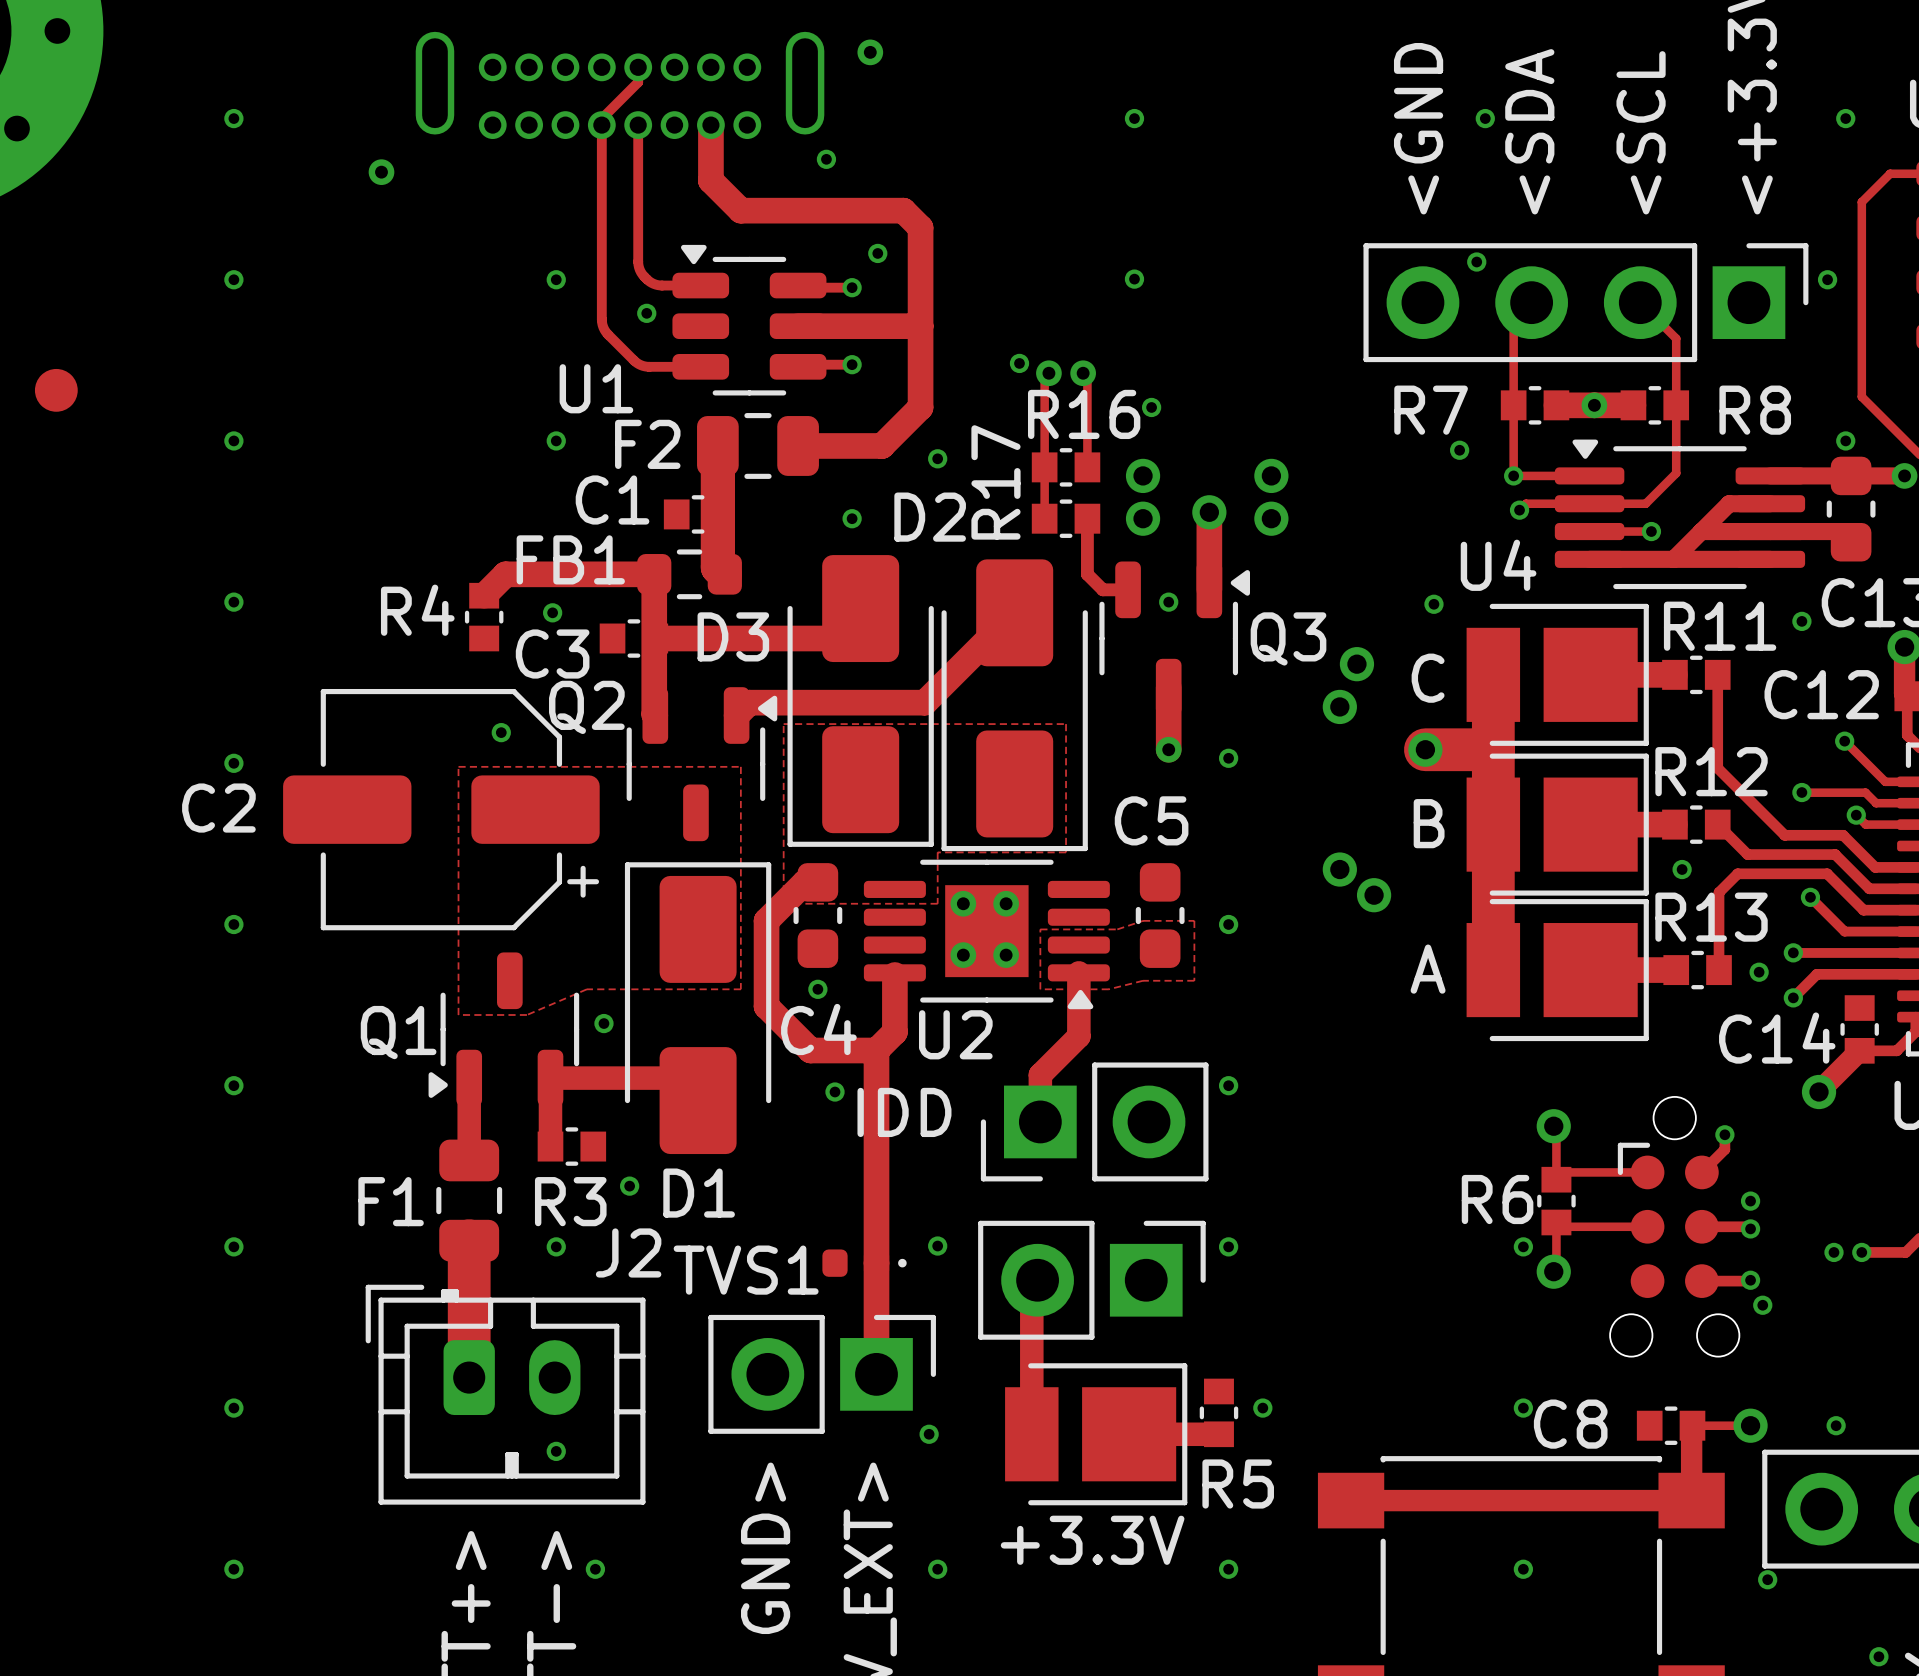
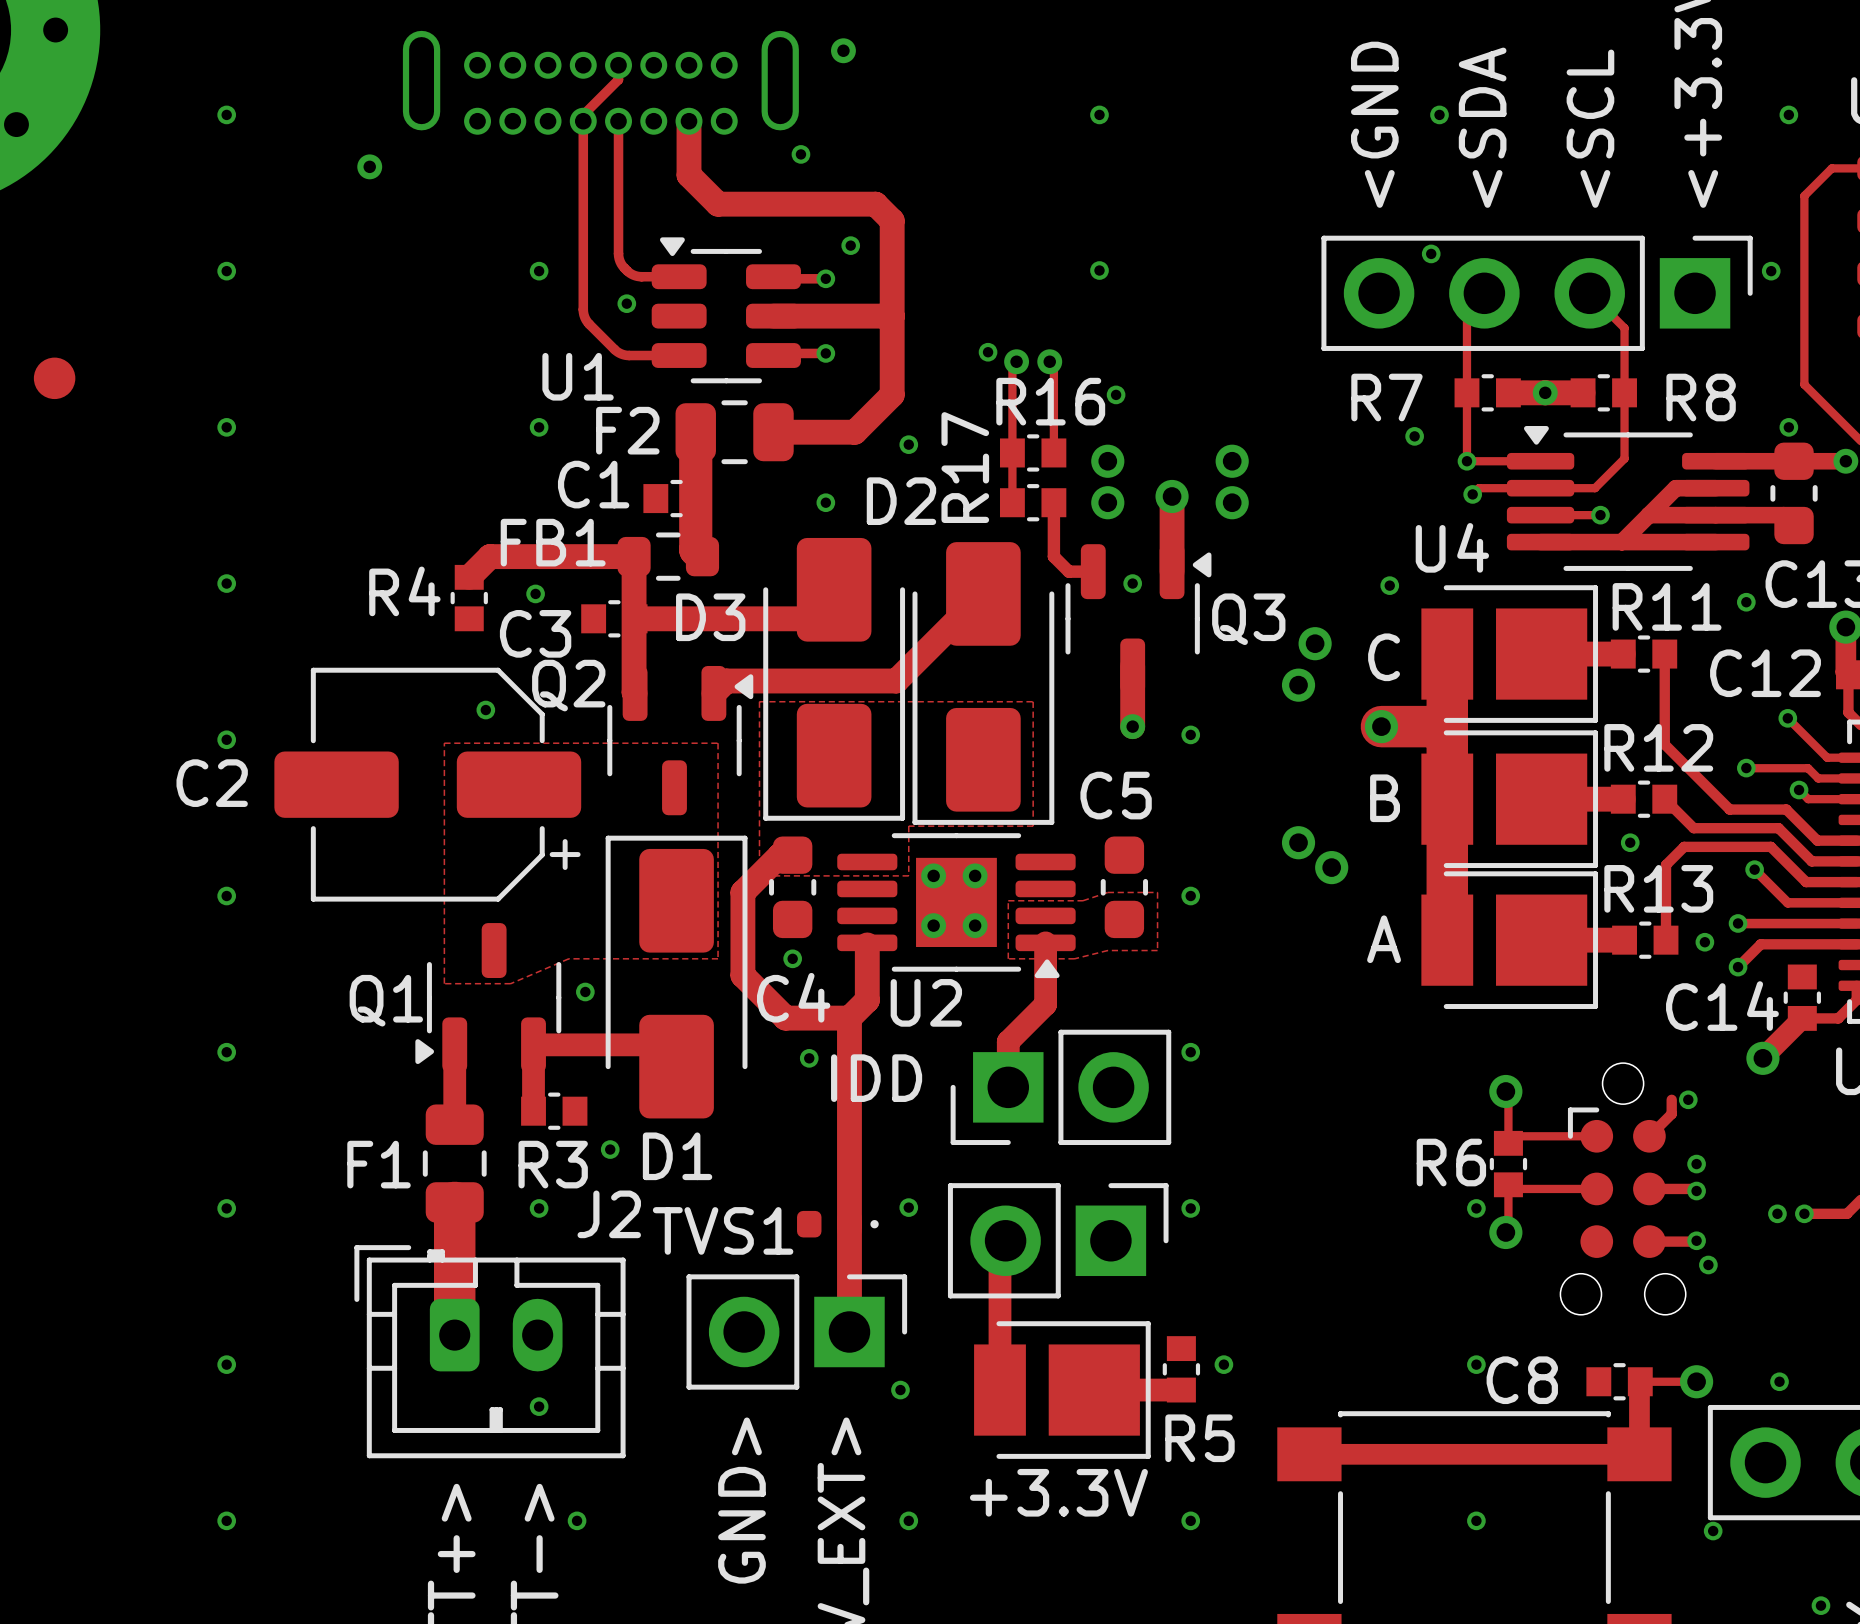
via position: (1724, 1134) -> (1688, 1099)

